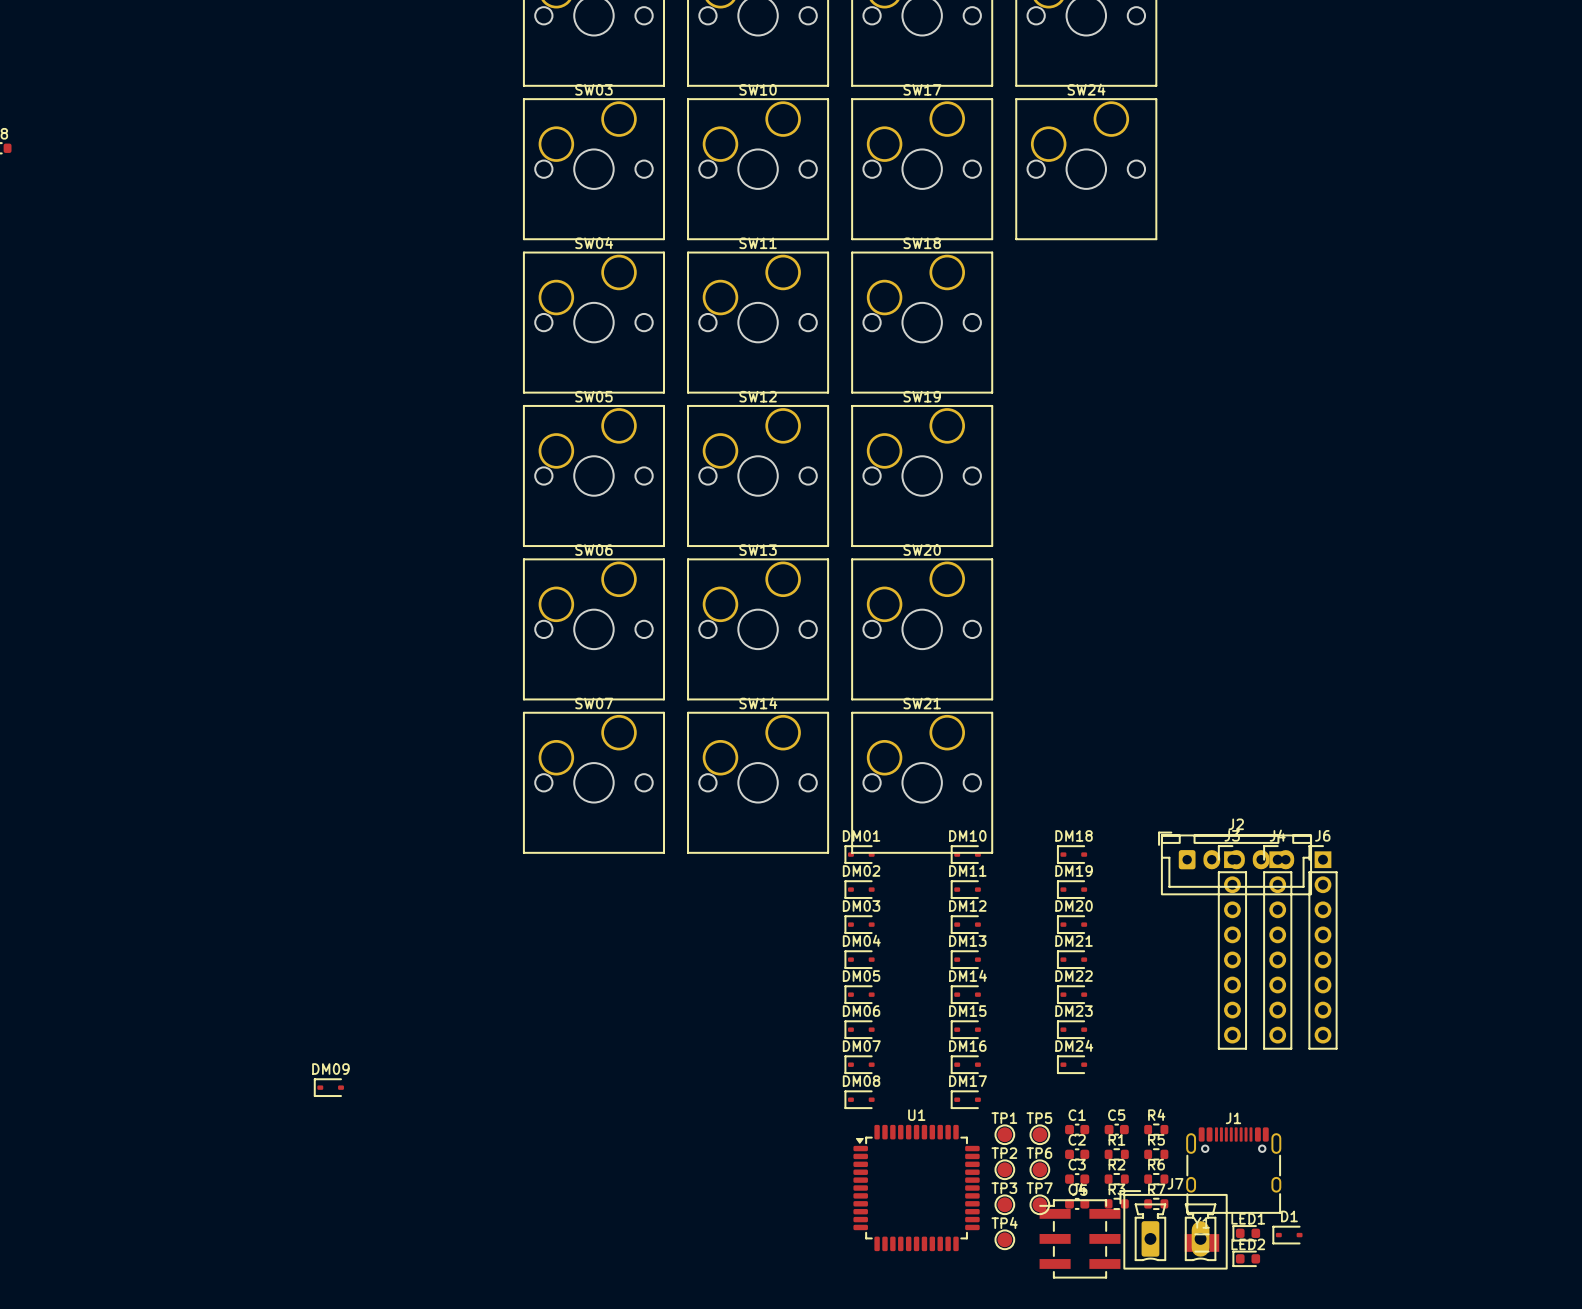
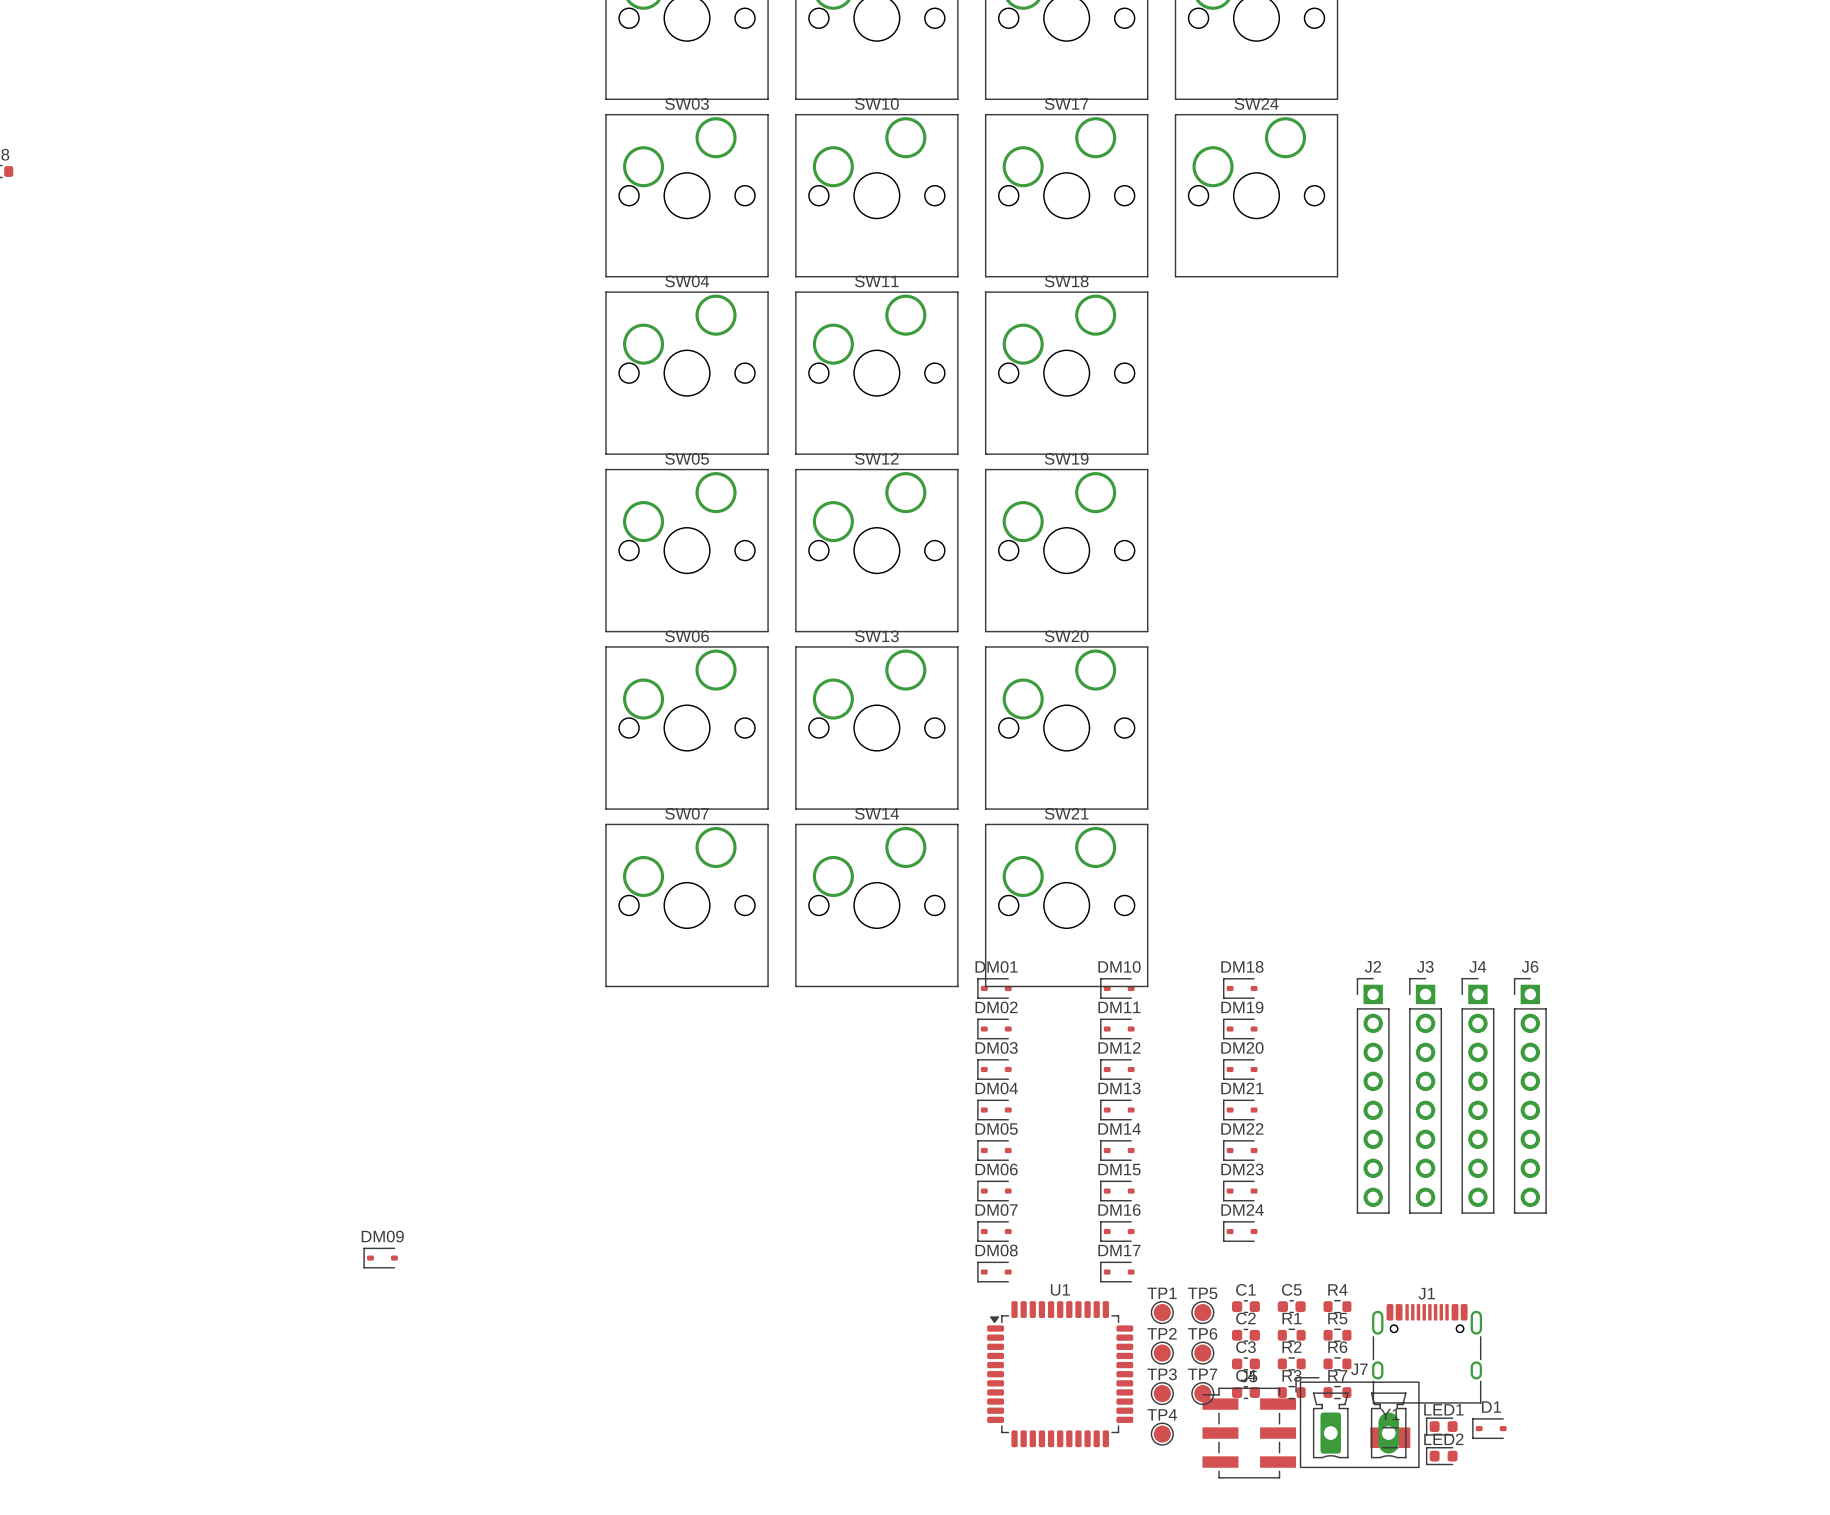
J2 name position: J2 (1236, 824) -> J2 (1372, 966)
J2 footprint: [1158, 831, 1312, 895] -> [1356, 977, 1390, 1214]

